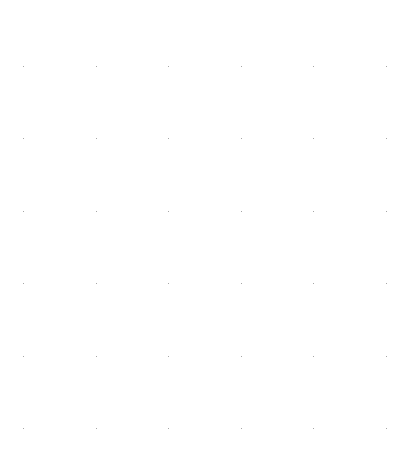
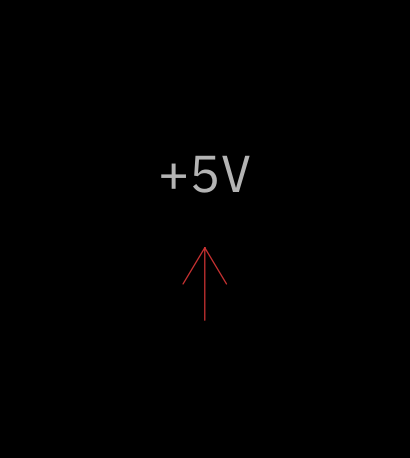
power symbol: none -> +5V (204, 283)

